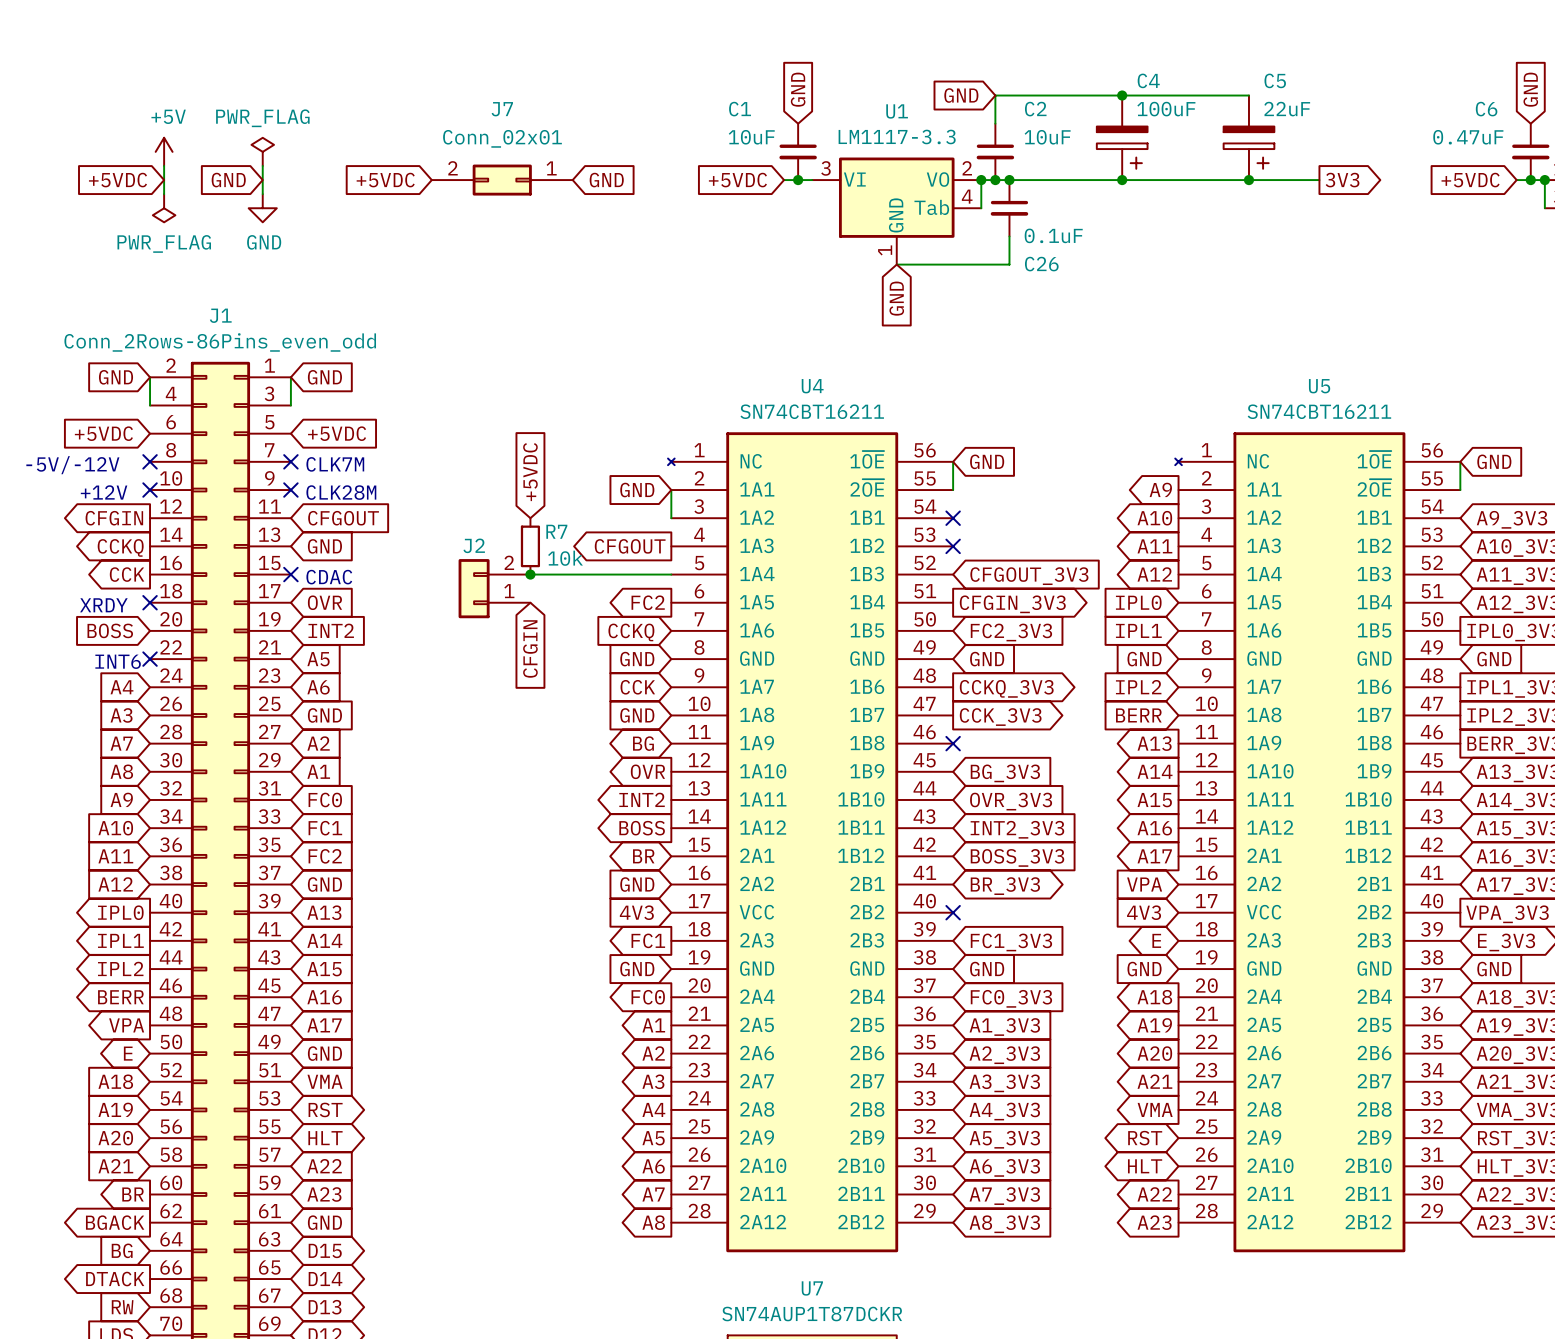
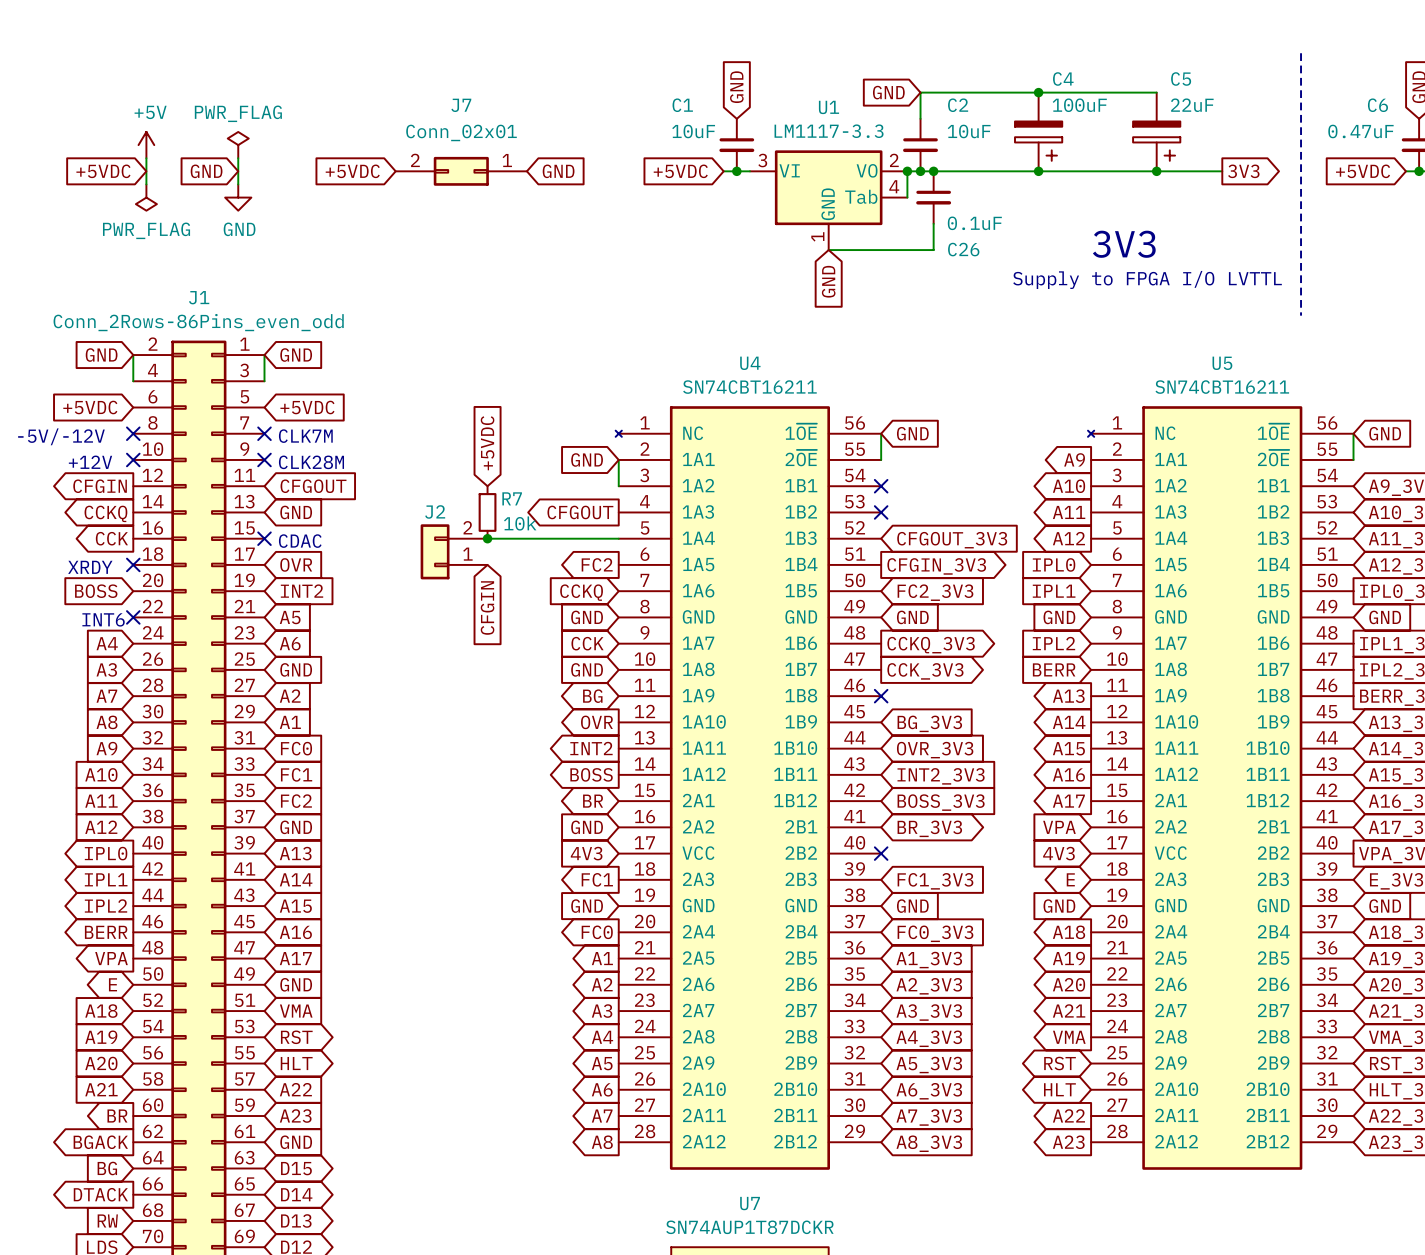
line: none -> (1301, 53) (1301, 315)
text: none -> 3V3 (1124, 244)
text: none -> Supply to FPGA I/O LVTTL (1147, 279)

